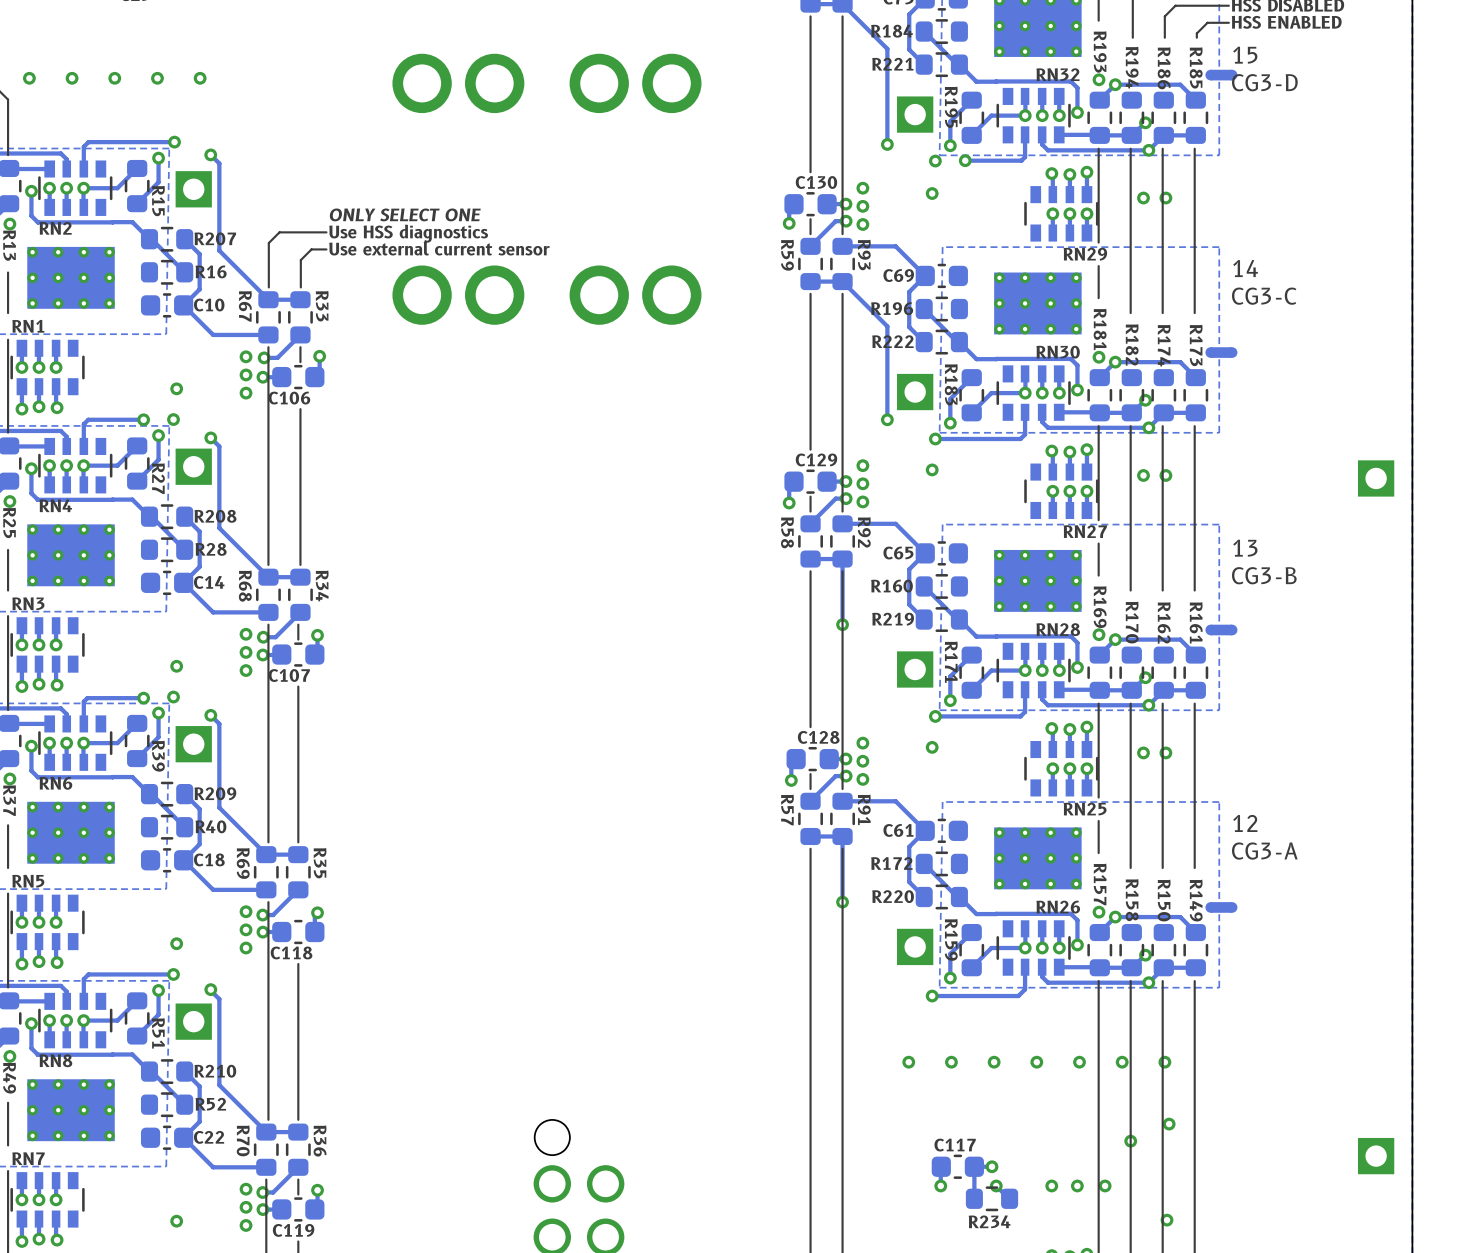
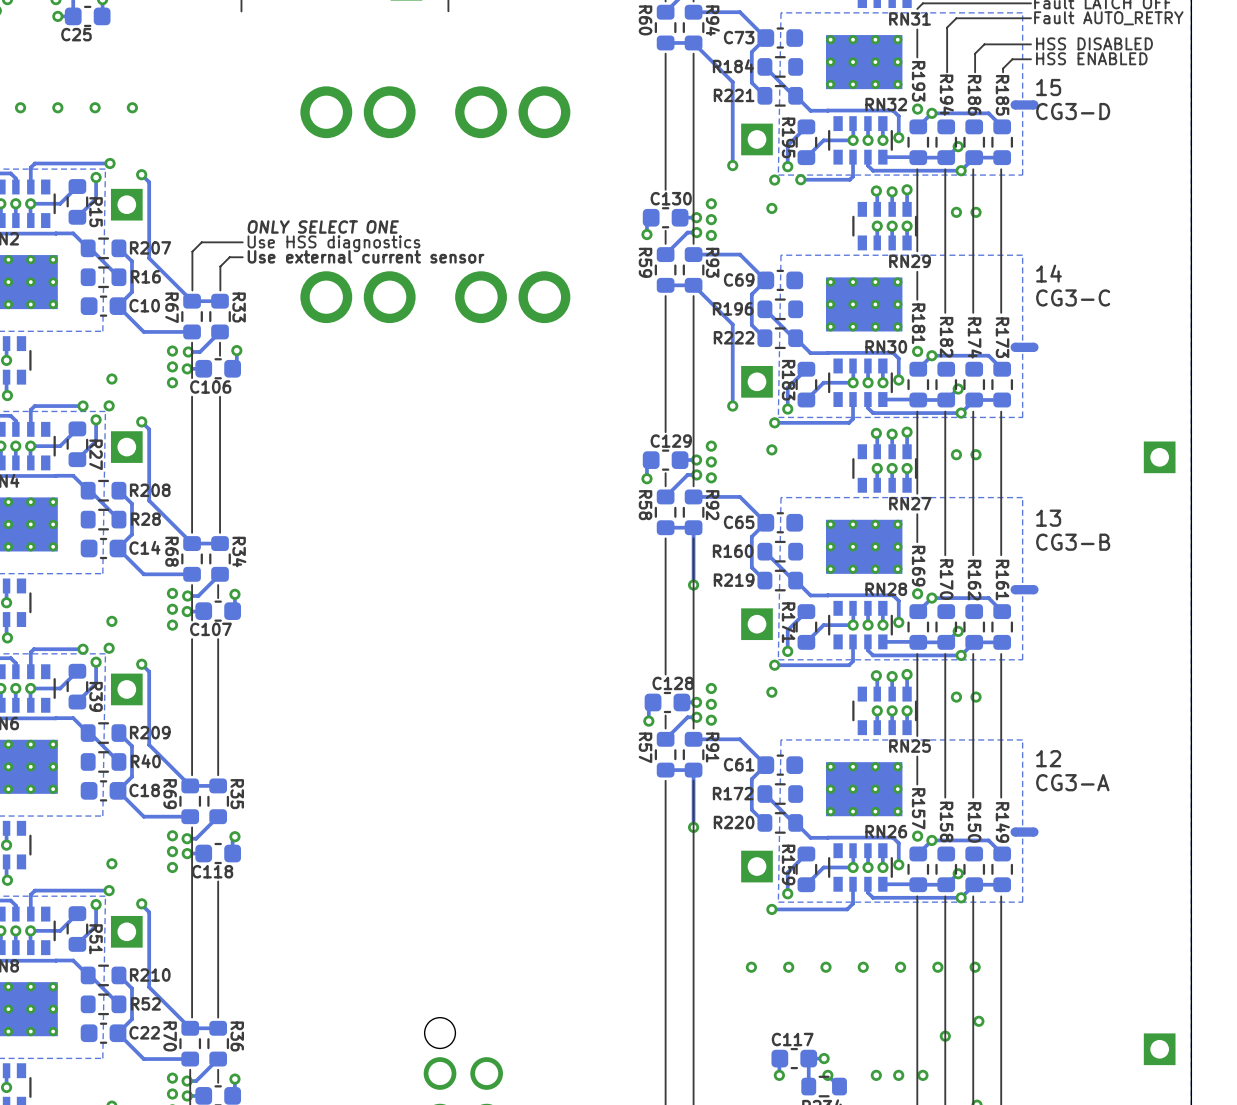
line: (268, 387) (268, 409) -> none
line: (268, 665) (268, 686) -> none

